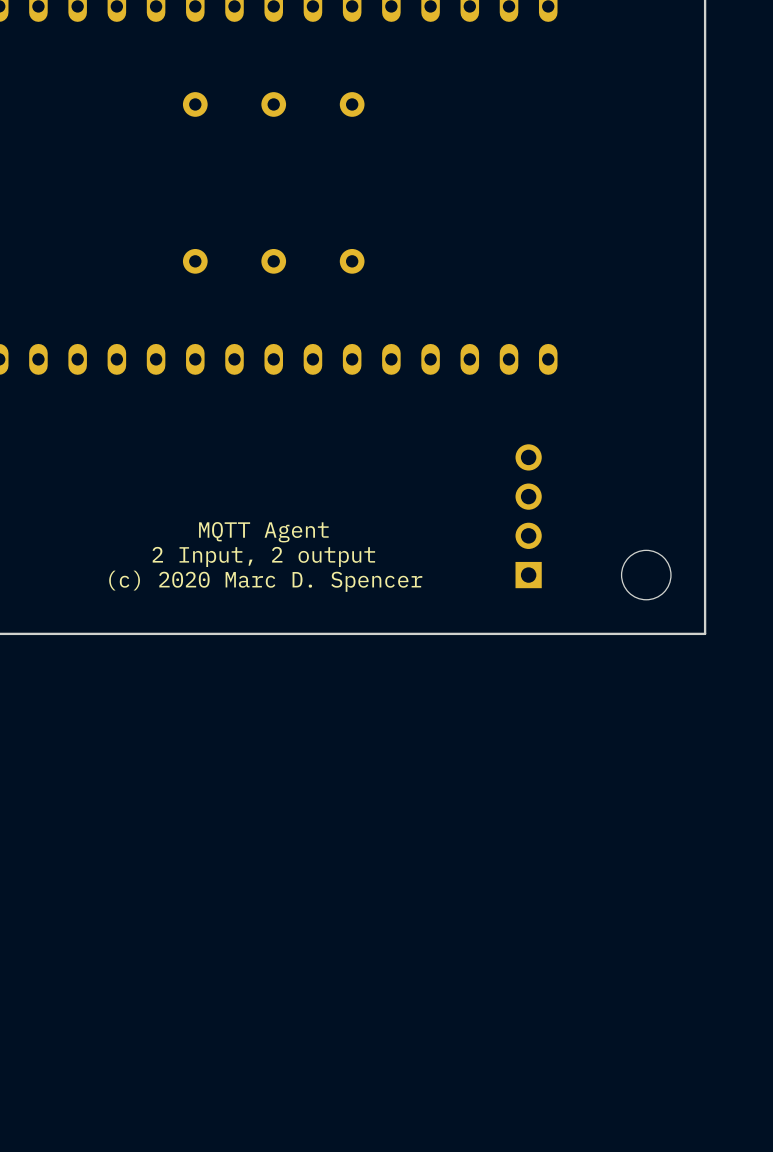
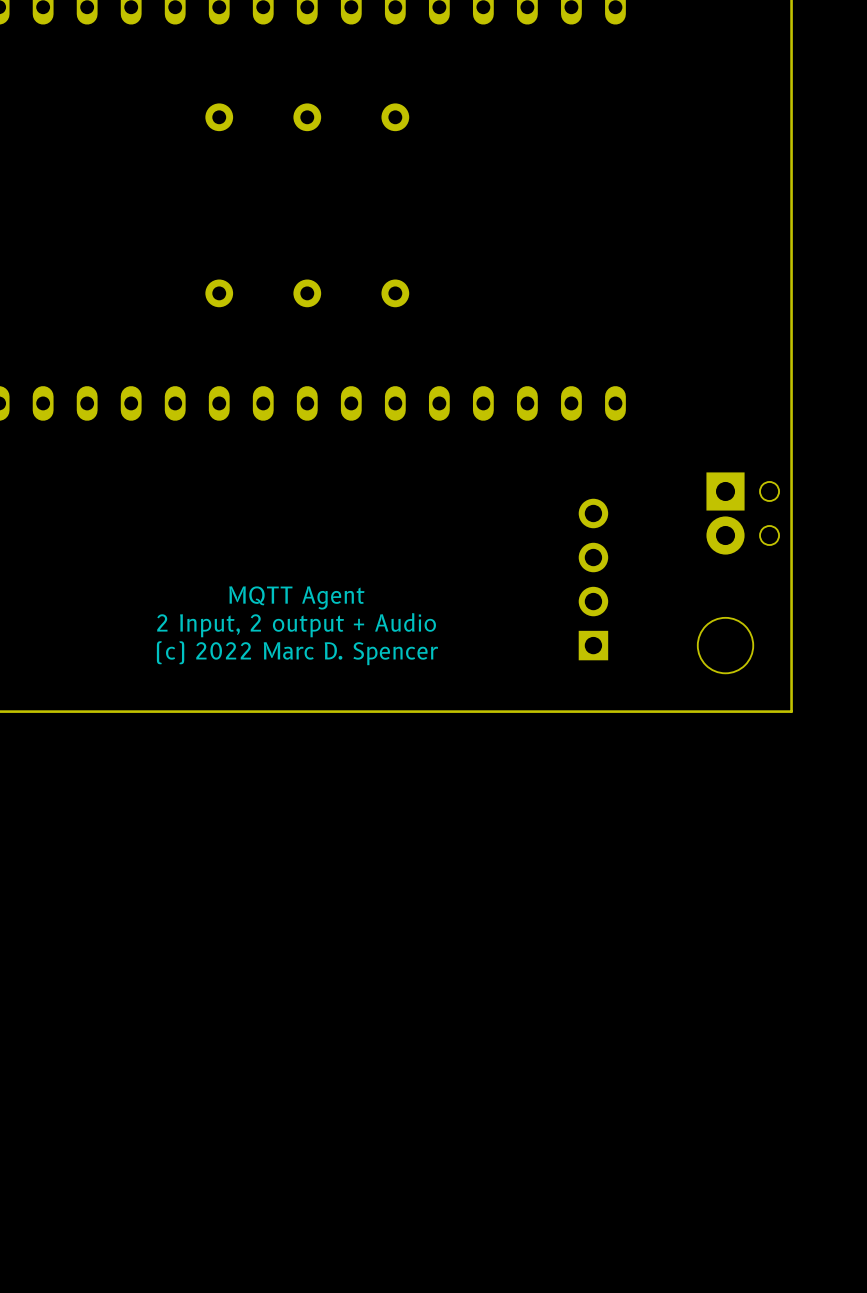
part: none -> (742, 513)
text: 2 Input, 2 output (263, 556) -> 2 Input, 2 output + Audio (296, 625)
text: (c) 2020 Marc D. Spencer (265, 581) -> (c) 2022 Marc D. Spencer (297, 653)

